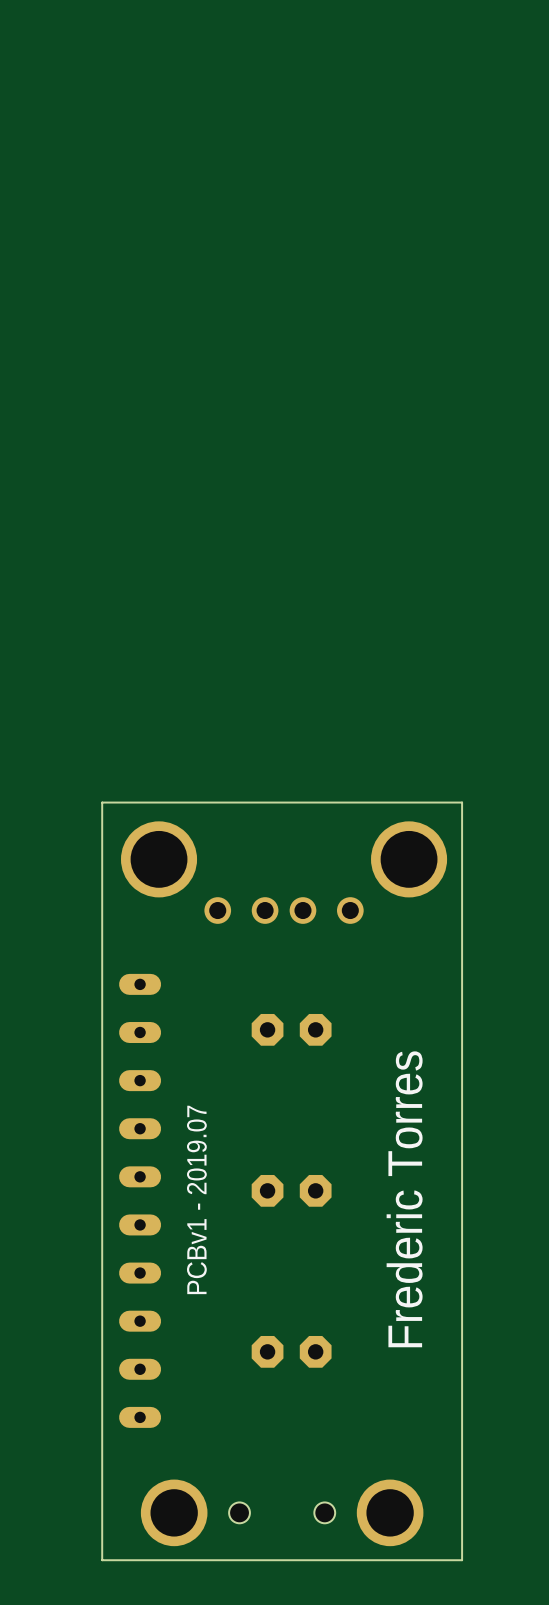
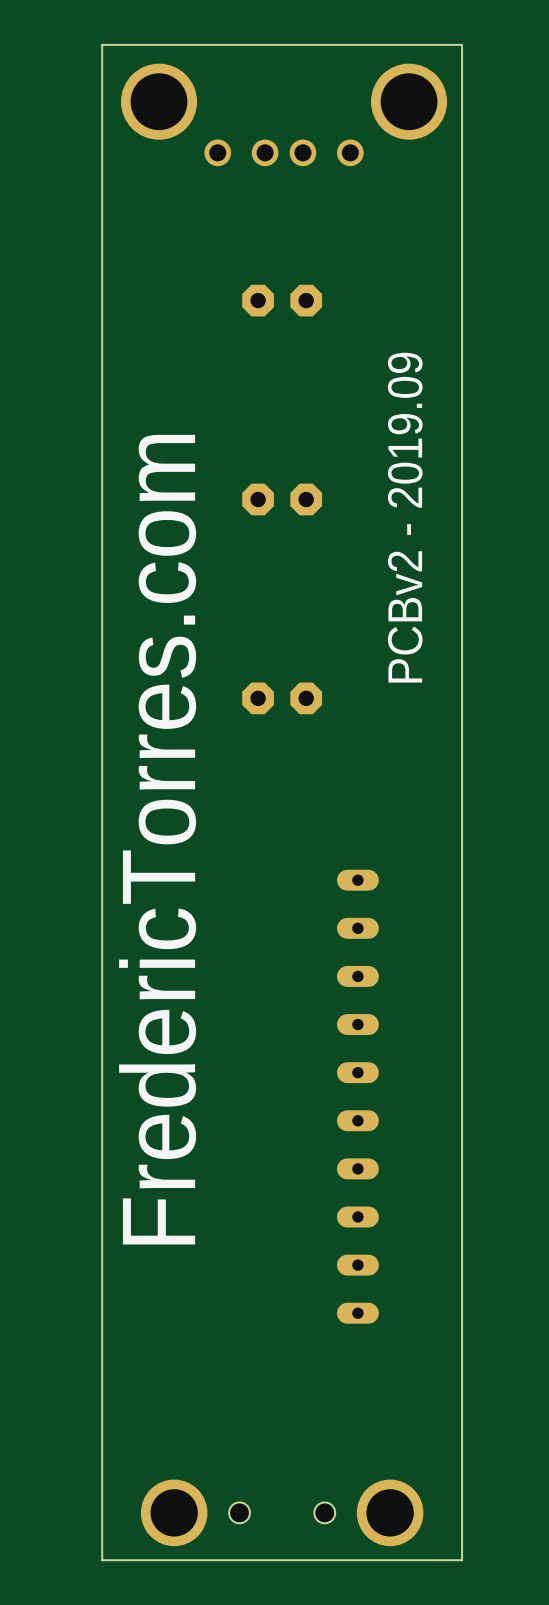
part: none -> (284, 114)
part: none -> (282, 300)
part: none -> (282, 499)
text: none -> PCBv2 - 2019.09 (405, 517)
part: none -> (282, 698)
board edge: (462, 802) (102, 802) -> (462, 802) (462, 44) (102, 44) (102, 802)
text: none -> FredericTorres.com (157, 839)
part: (284, 872) -> none
part: (291, 1029) -> none
part: (291, 1190) -> none
text: PCBv1 - 2019.07 (196, 1199) -> none
text: Frederic Torres (404, 1199) -> none
part position: (140, 1200) -> (357, 1096)
part: (291, 1351) -> none

